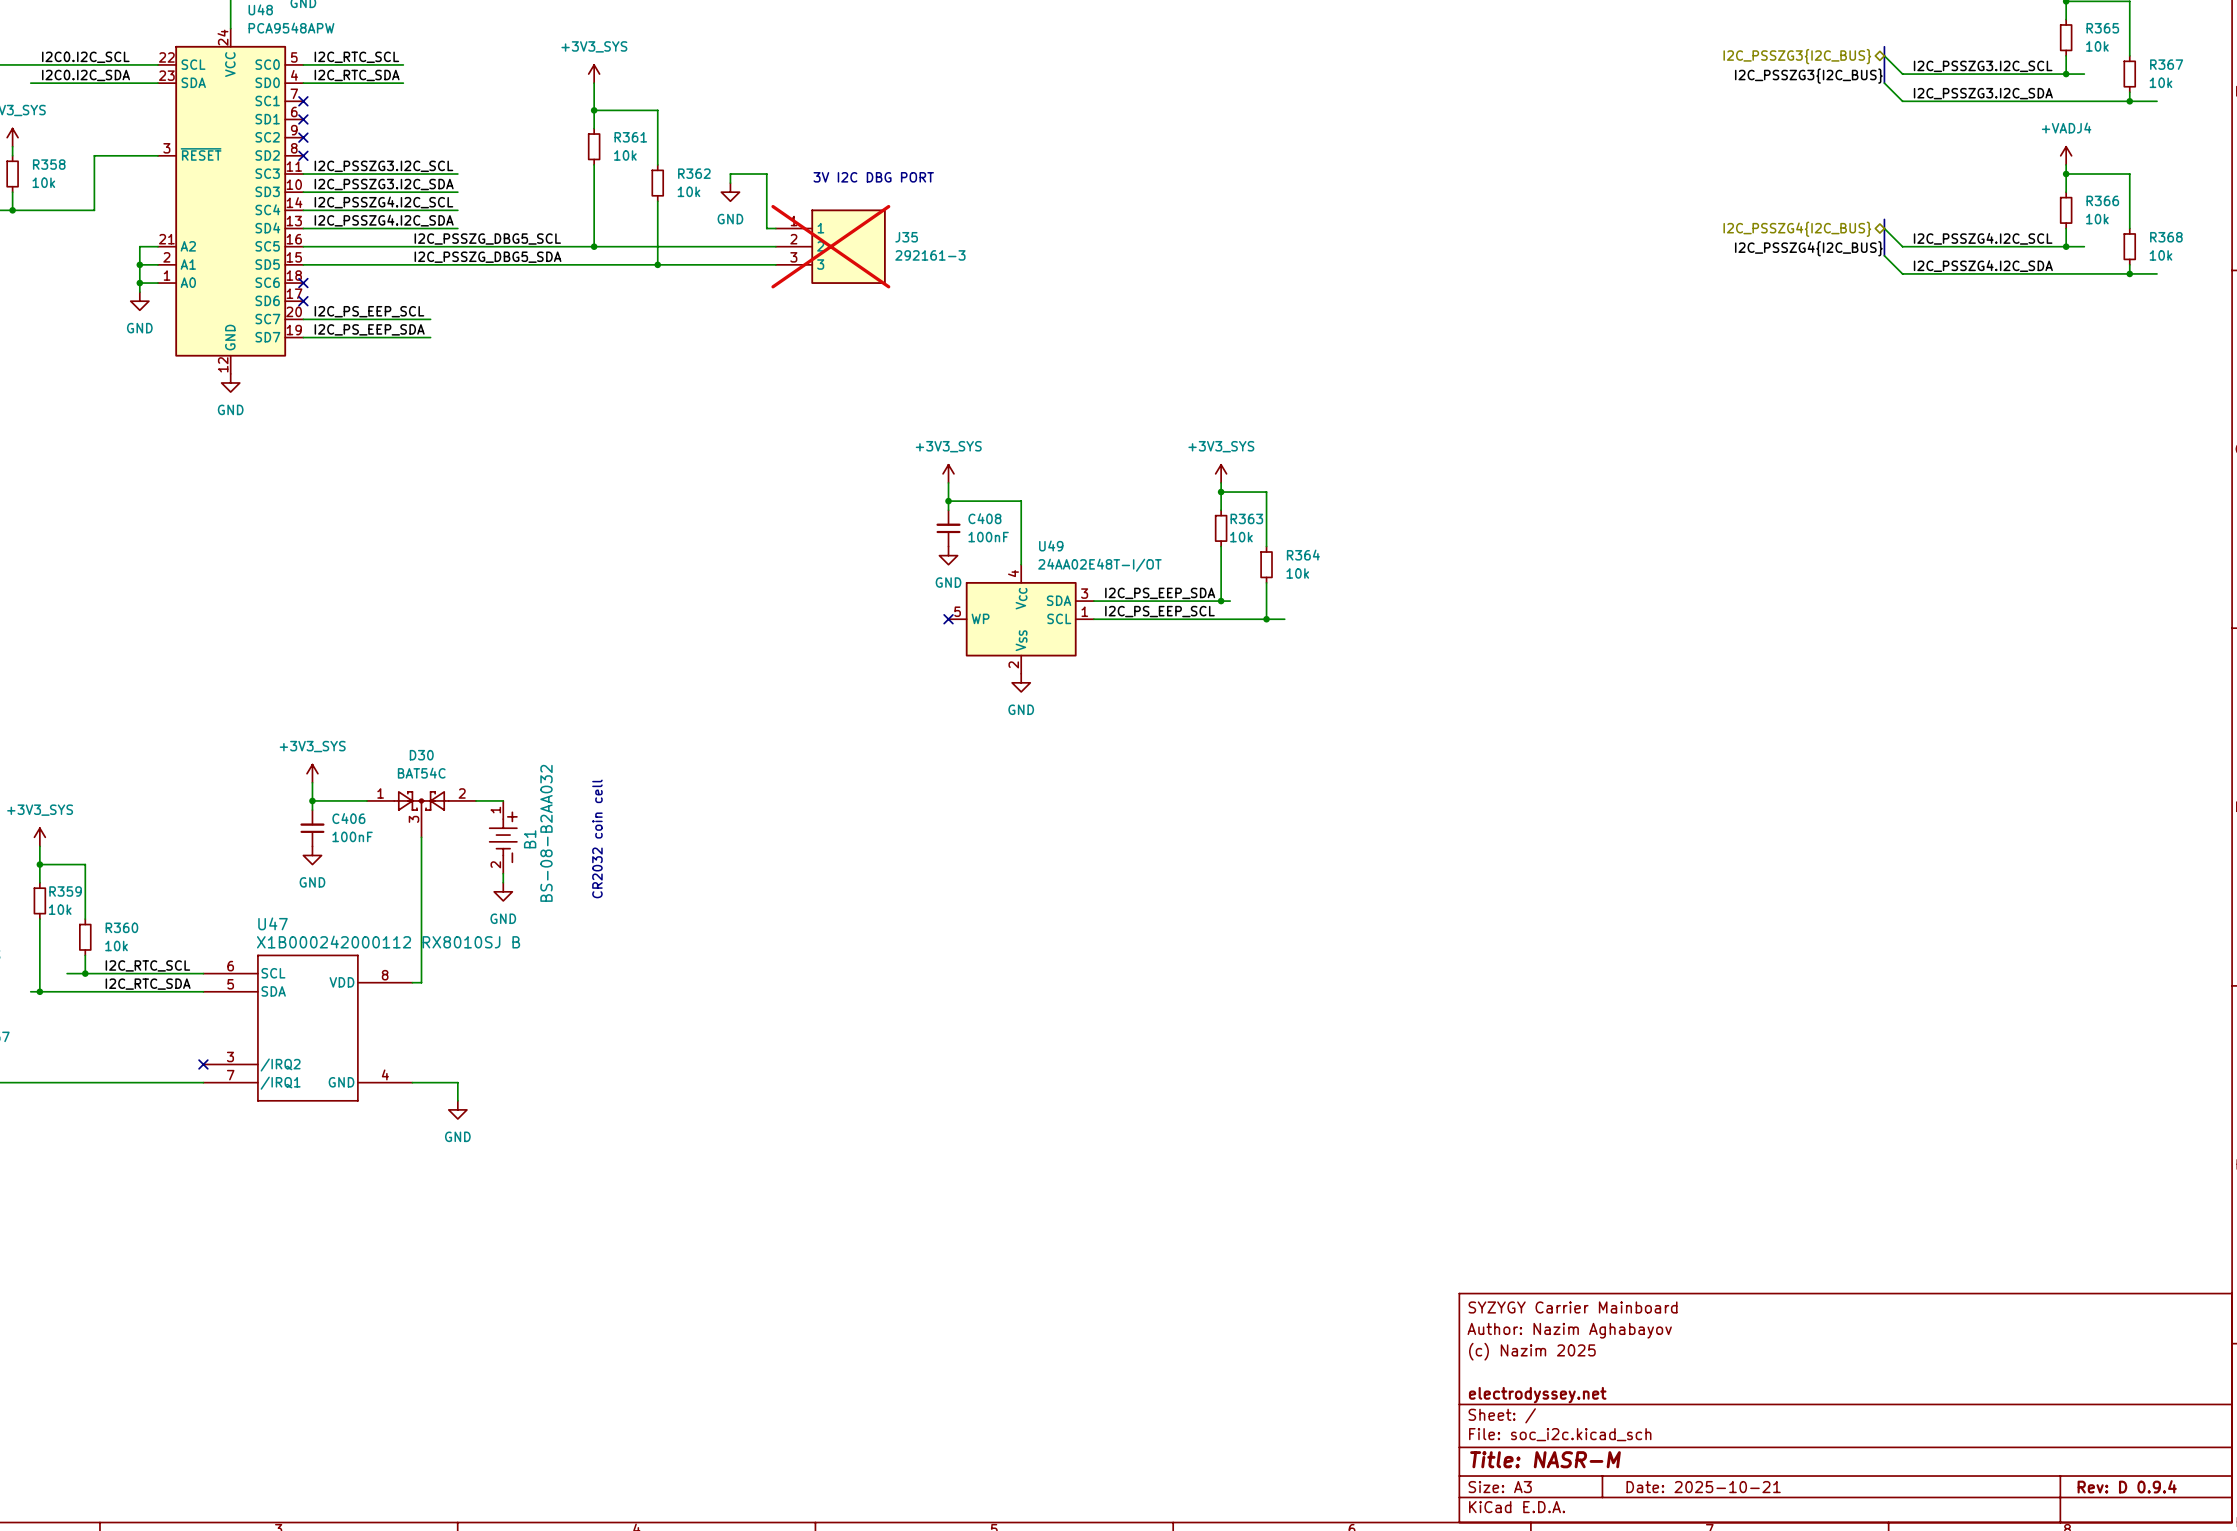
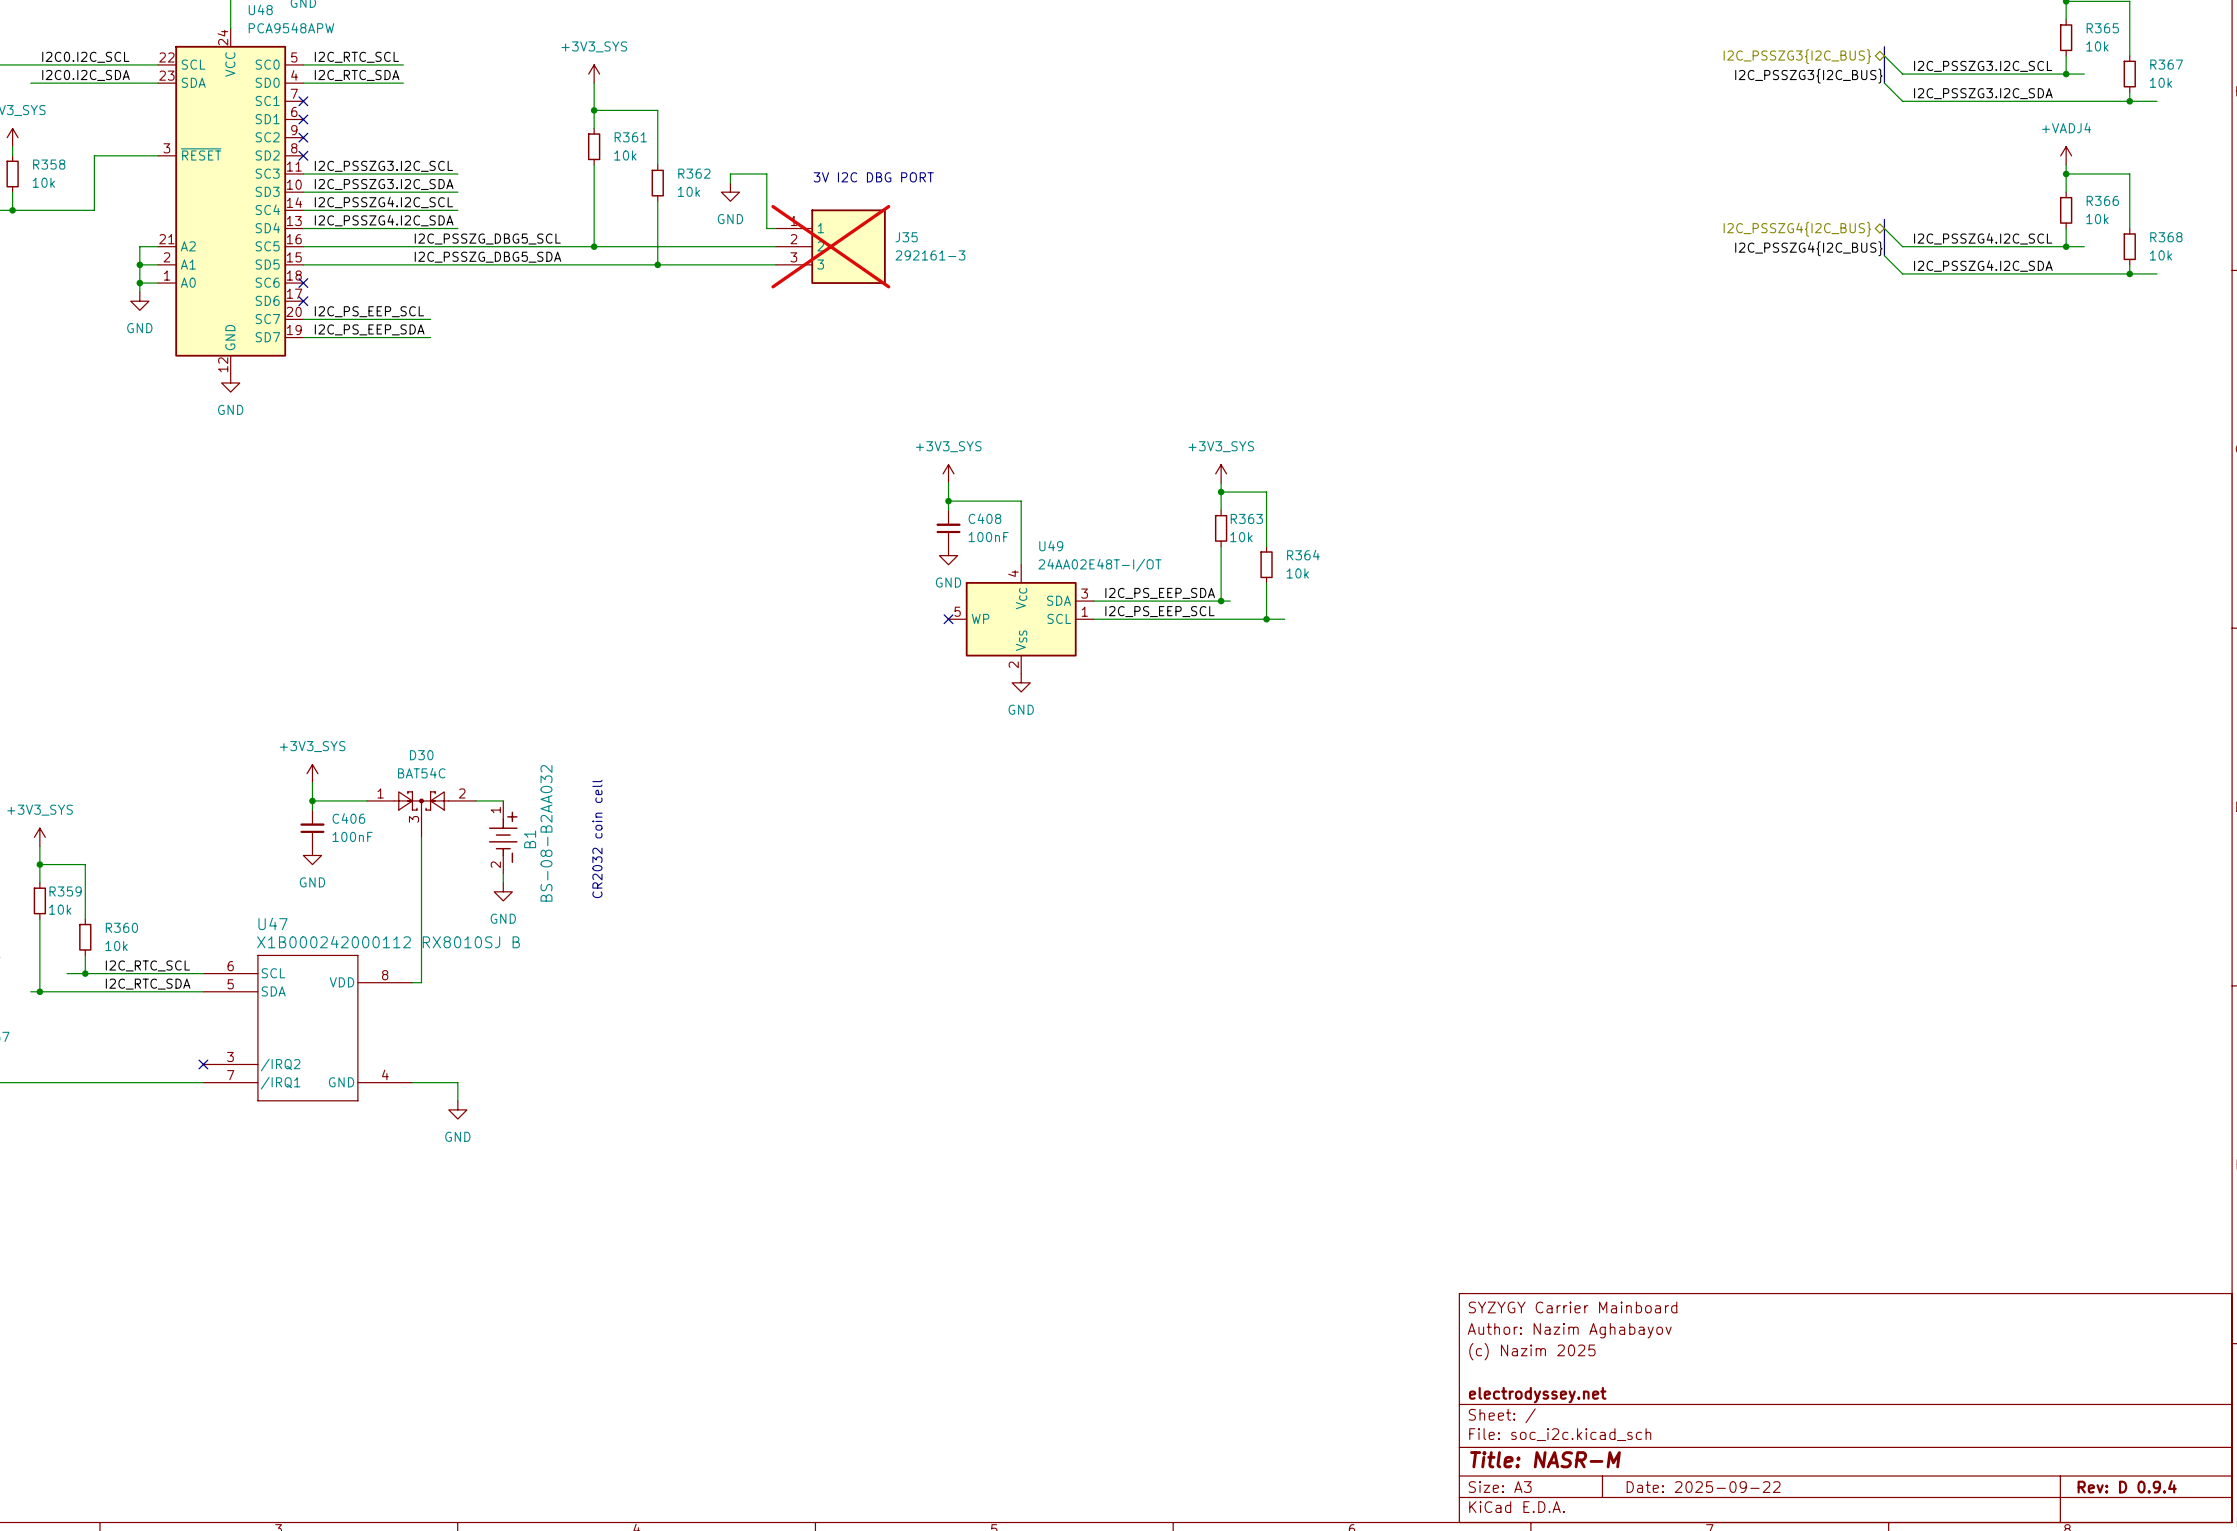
title block: Date: 2025-10-21 (1703, 1487) -> Date: 2025-09-22 (1703, 1487)

